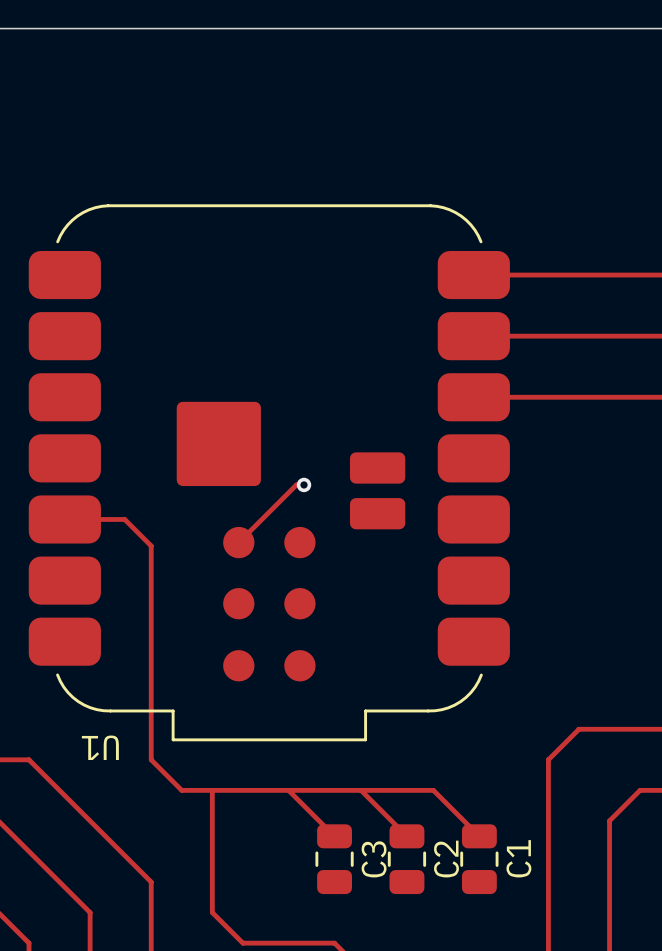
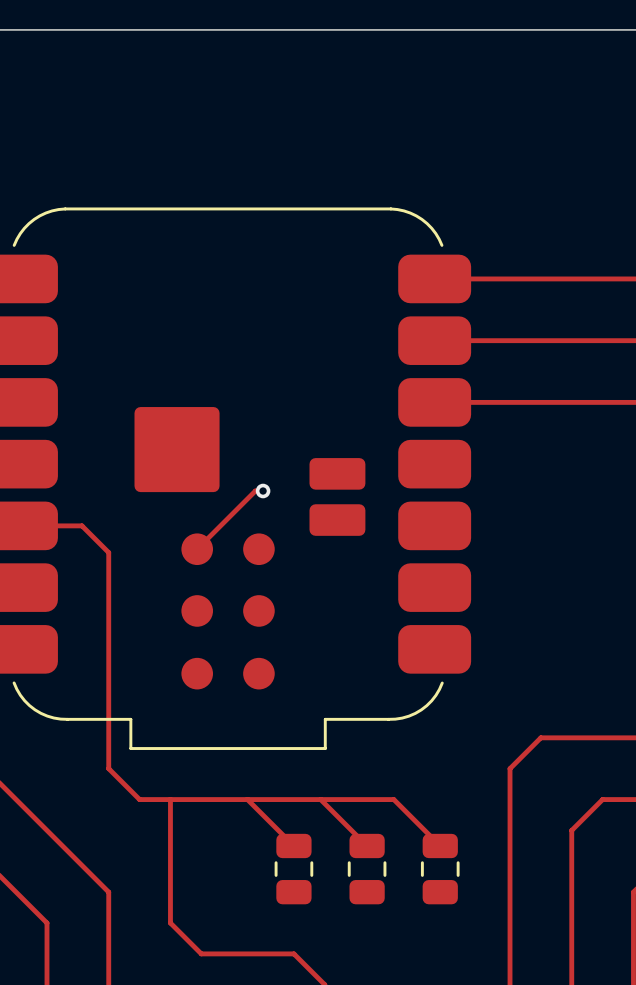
U1 name: U1 (100, 747) -> none
C1 name: C1 (518, 858) -> none
C3 name: C3 (374, 859) -> none
C2 name: C2 (446, 859) -> none

